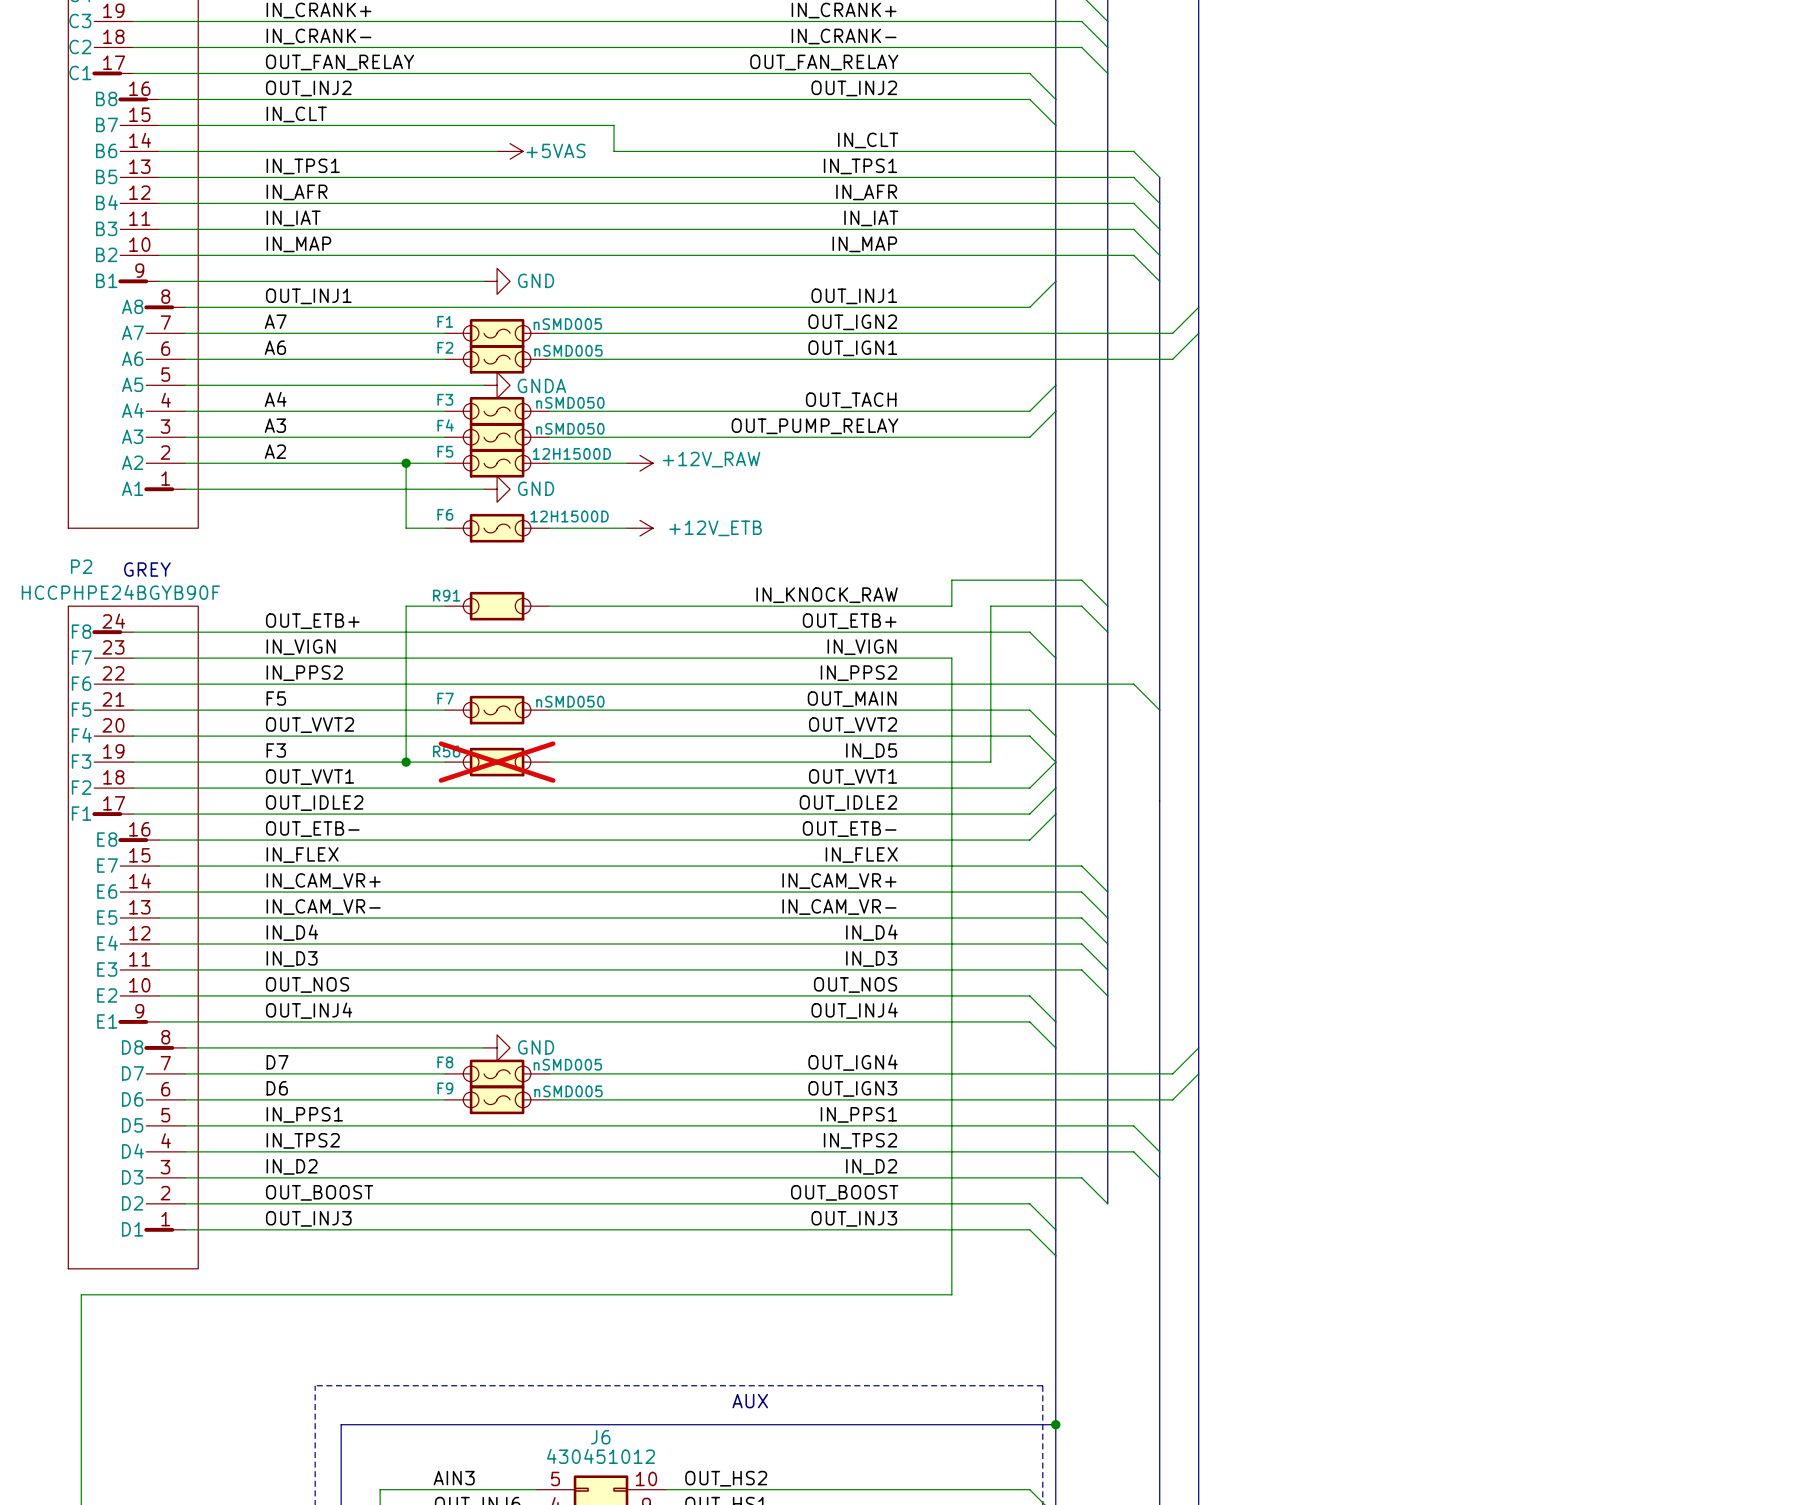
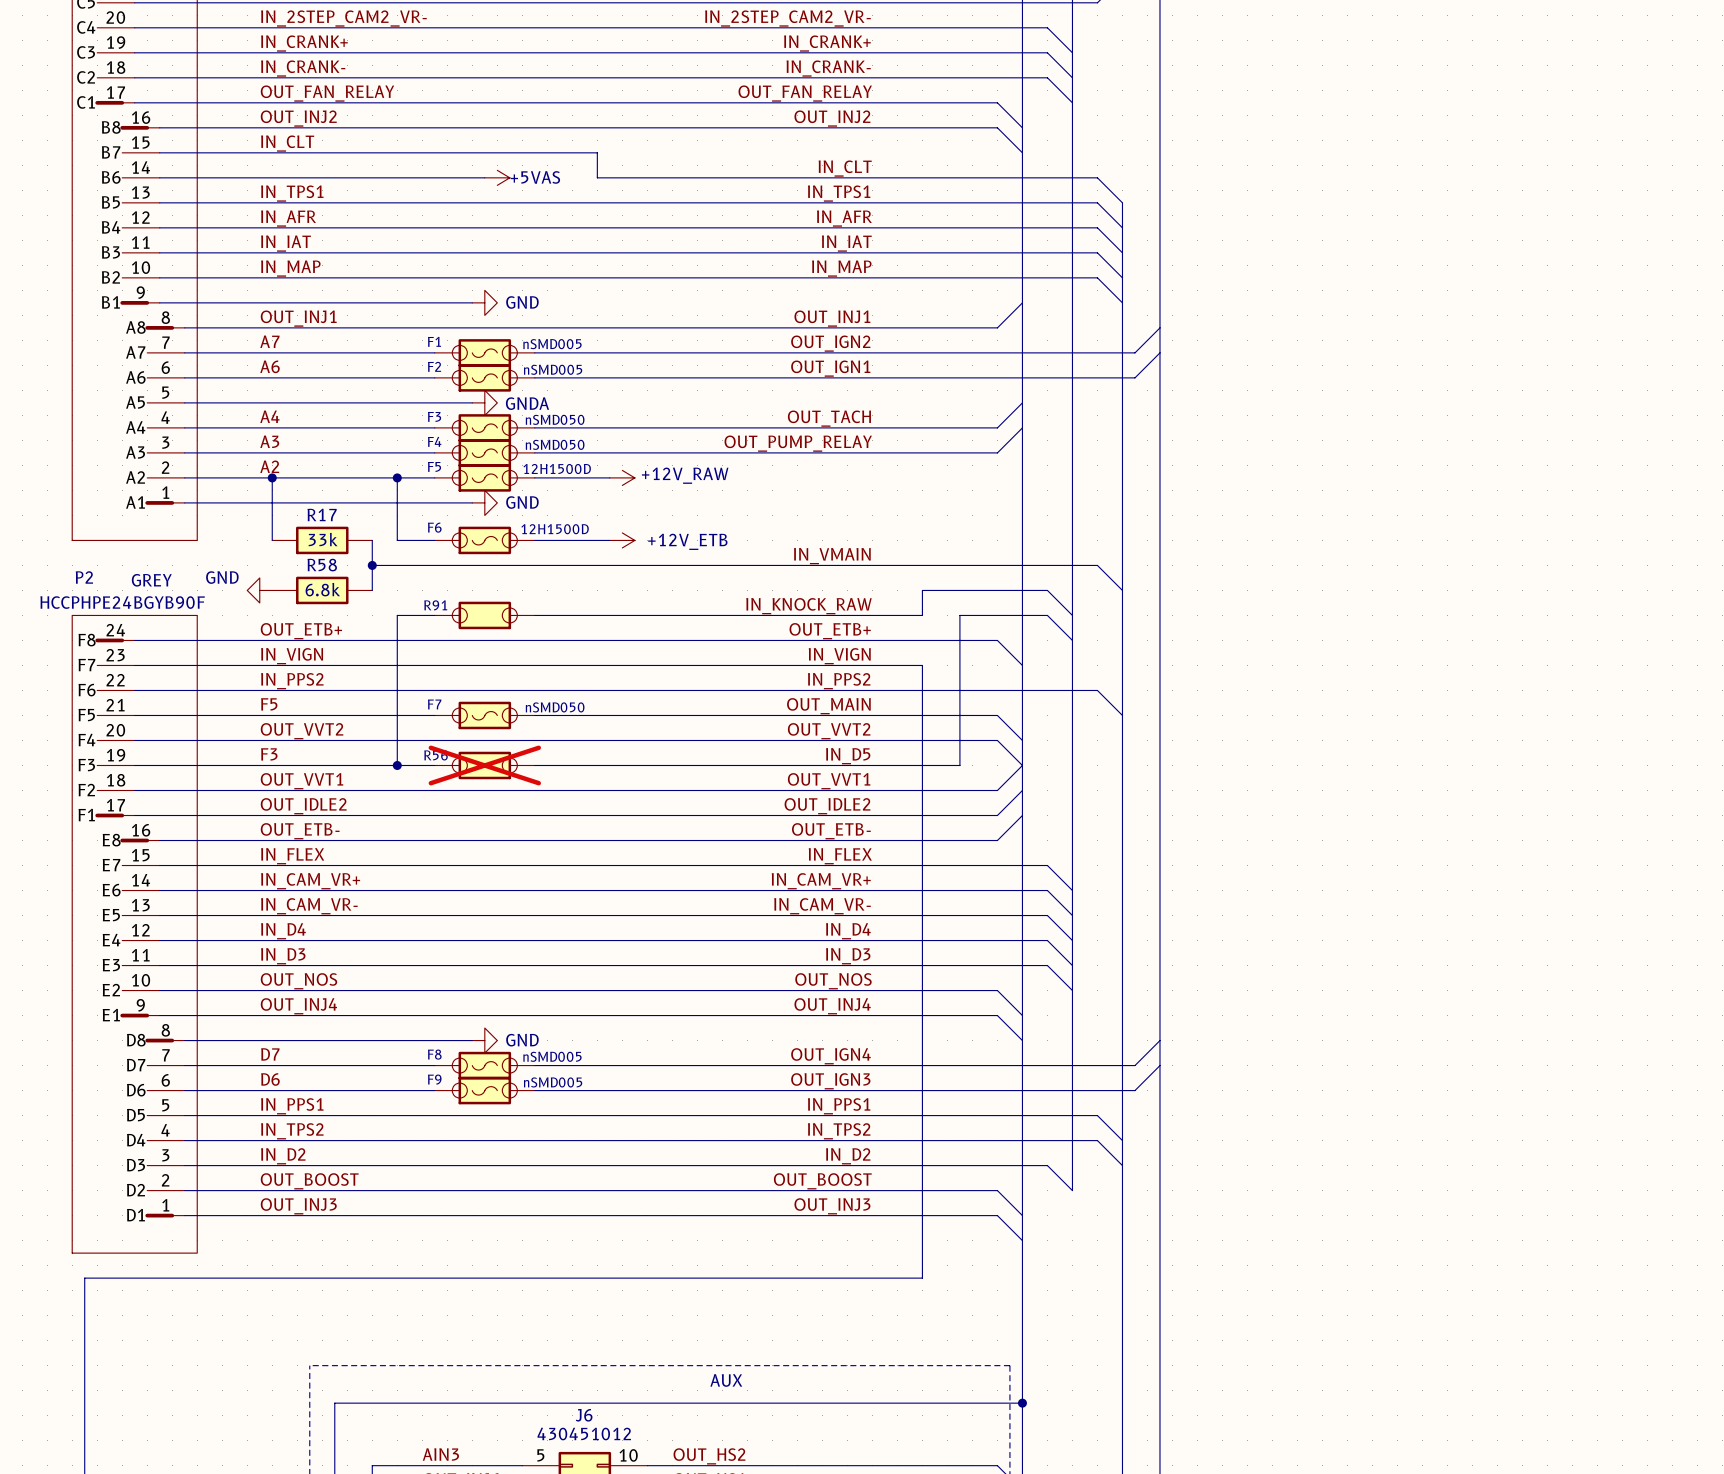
wire: none -> (272, 477) (272, 540)
junction: none -> (272, 477)
R17: none -> 33k (322, 540)
wire: none -> (372, 540) (372, 590)
label: none -> IN_VMAIN (832, 556)
wire: none -> (372, 565) (1097, 565) (1122, 590)
junction: none -> (372, 565)
power symbol: none -> GND (259, 590)
R58: none -> 6.8k (322, 590)

